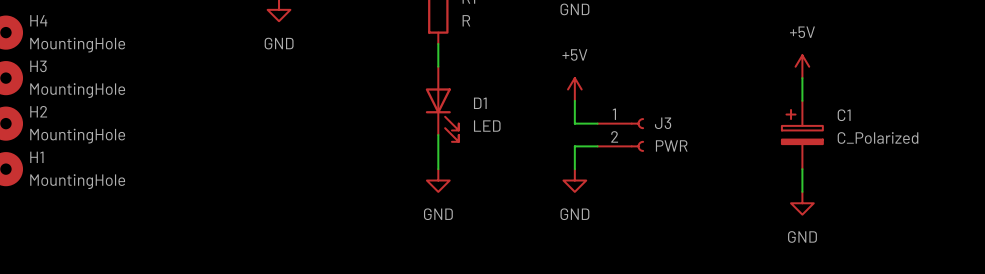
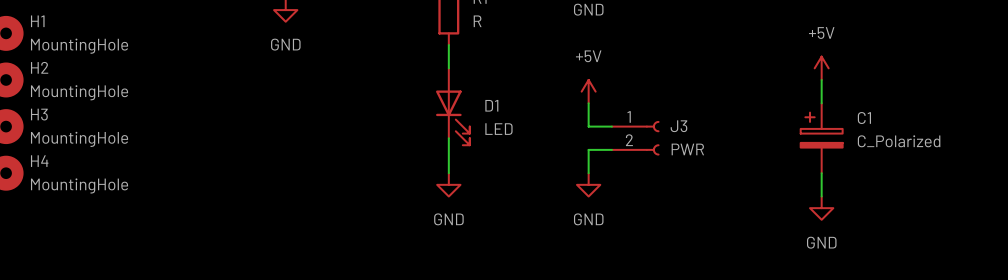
H4 name: H4 (38, 20) -> H1 (37, 21)
H3 name: H3 (38, 66) -> H2 (39, 67)
H2 name: H2 (38, 111) -> H3 (39, 114)
H1 name: H1 (36, 157) -> H4 (39, 161)

